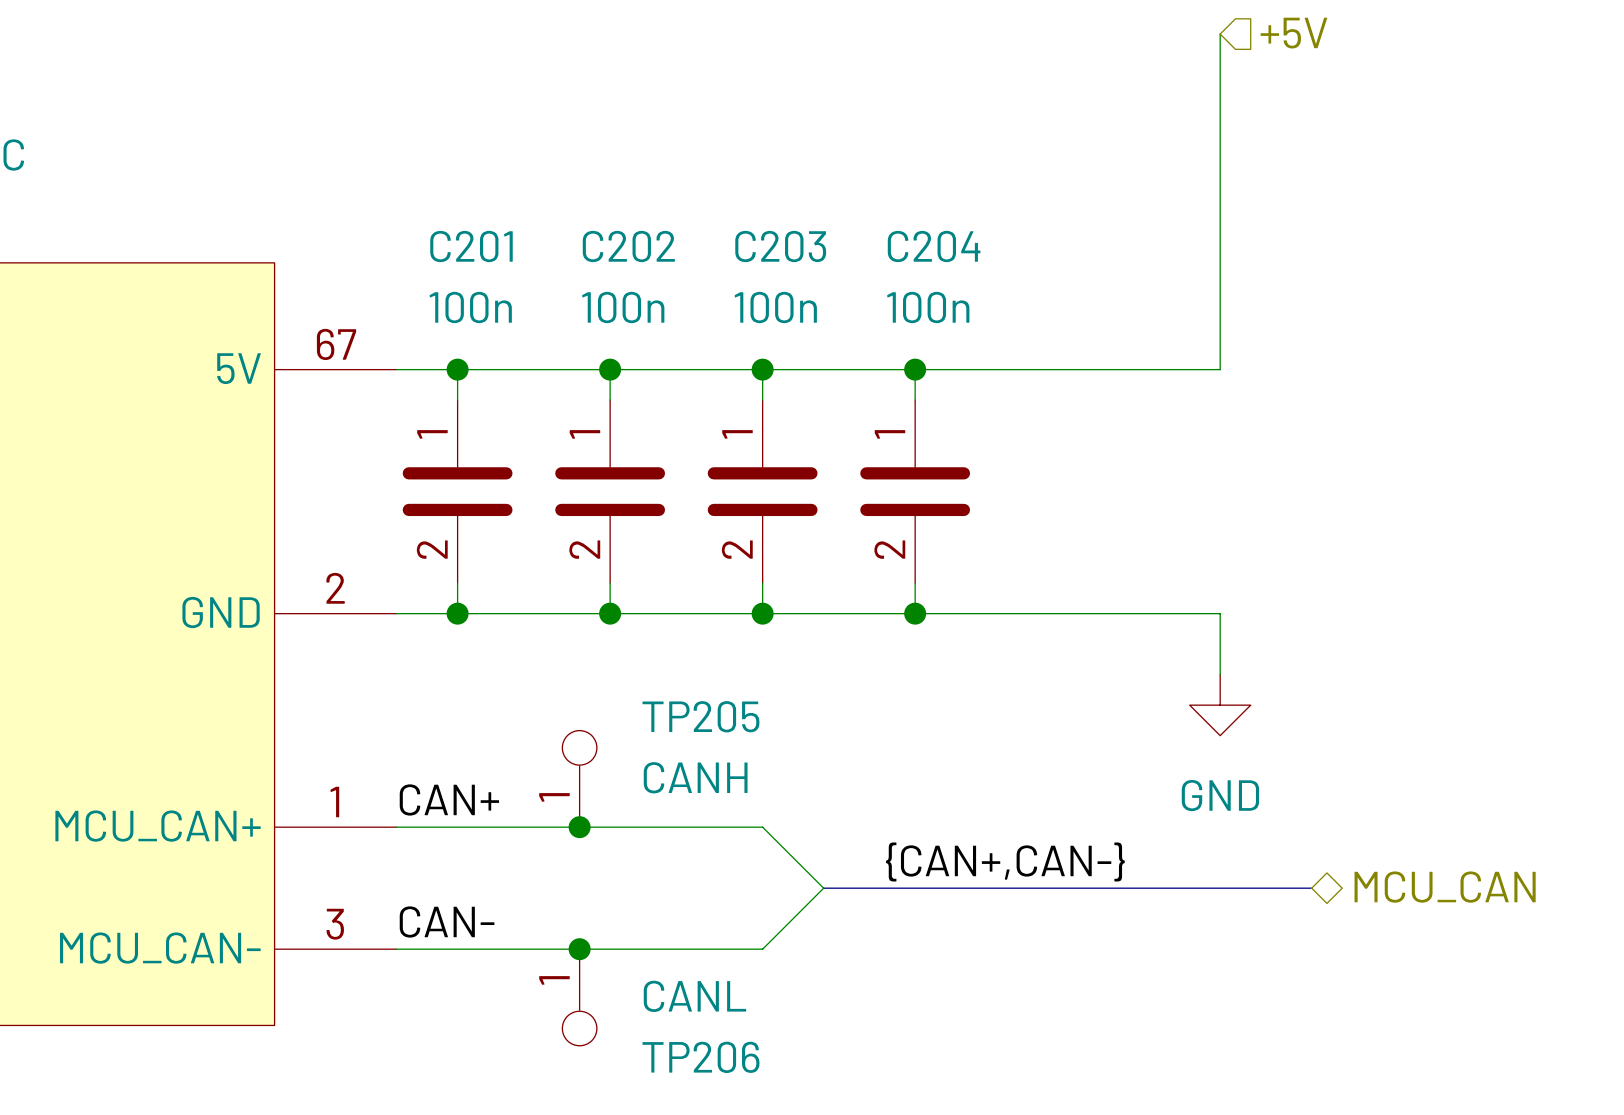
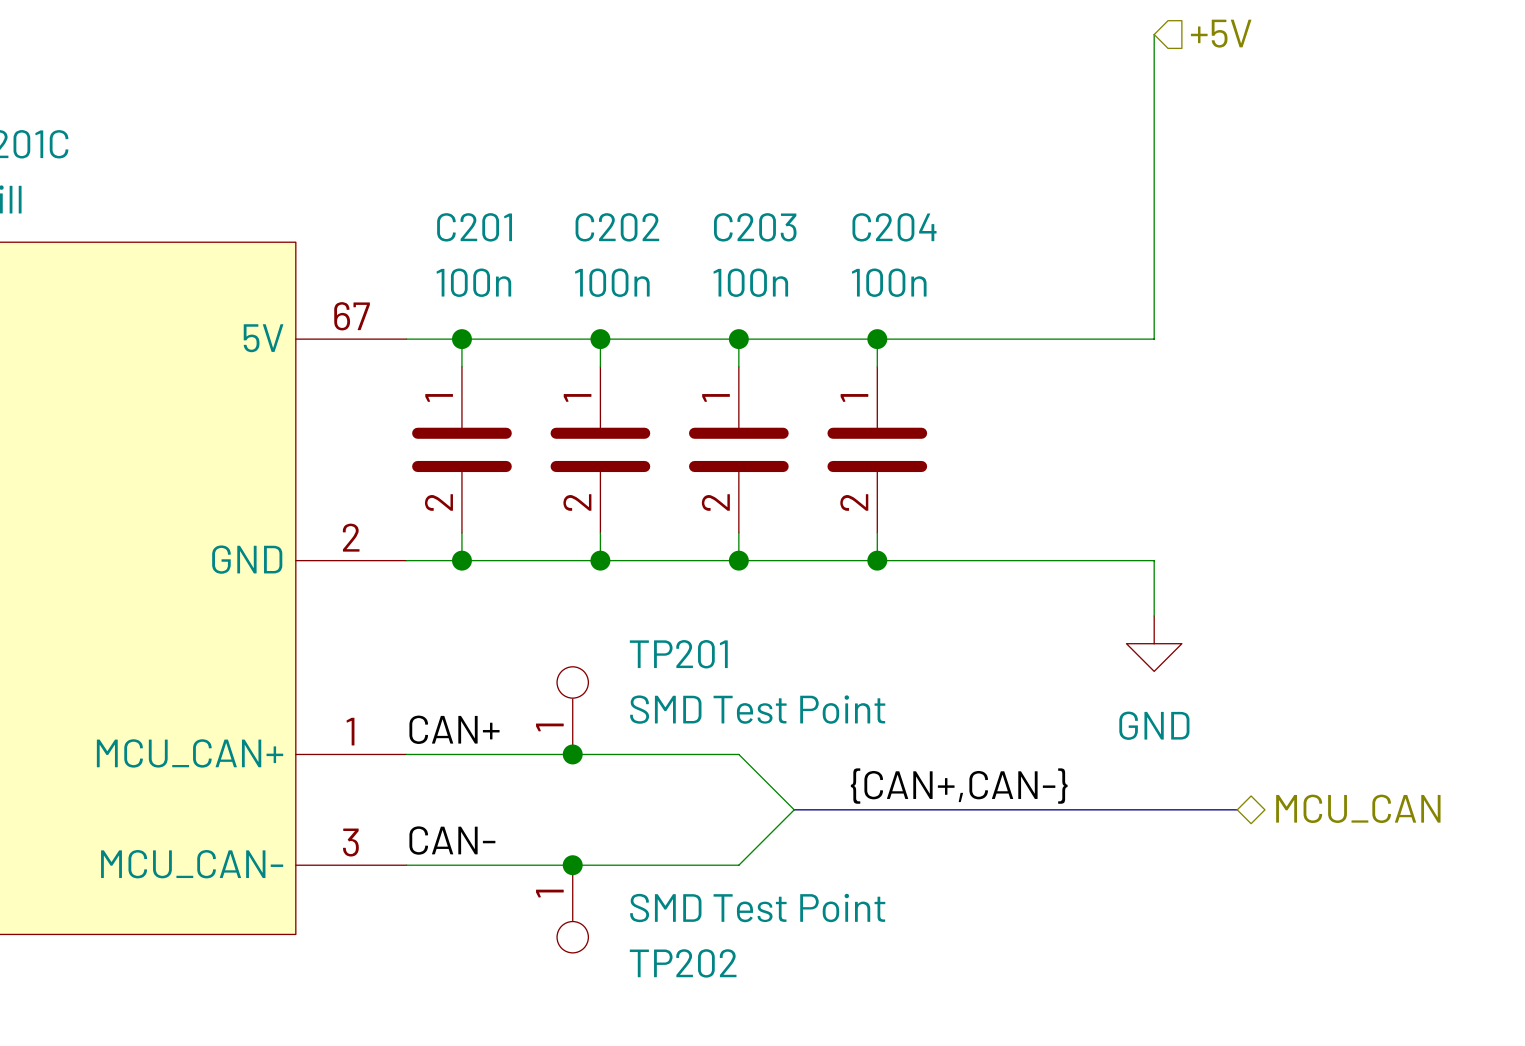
TP205 name: TP205 (700, 716) -> TP201 (678, 654)
TP205 value: CANH (695, 777) -> SMD Test Point (757, 709)
TP206 value: CANL (694, 996) -> SMD Test Point (757, 907)
TP206 name: TP206 (700, 1057) -> TP202 (683, 963)

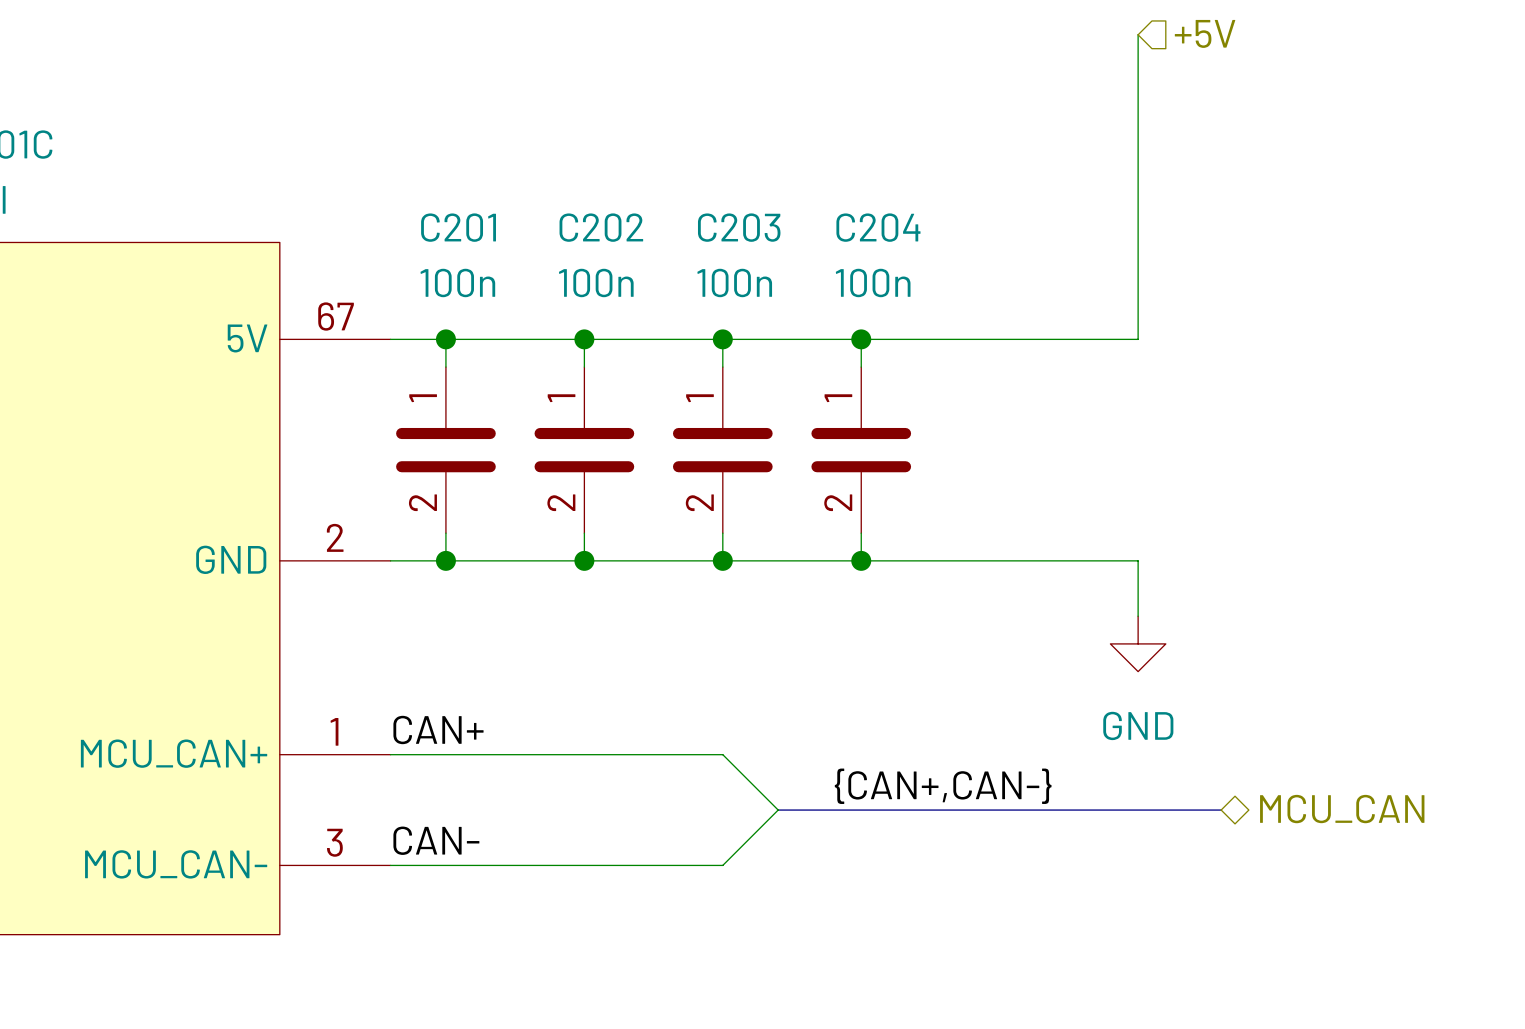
TP201: SMD Test Point (572, 710) -> none
junction: (572, 754) -> none
junction: (572, 865) -> none
TP202: SMD Test Point (572, 909) -> none

